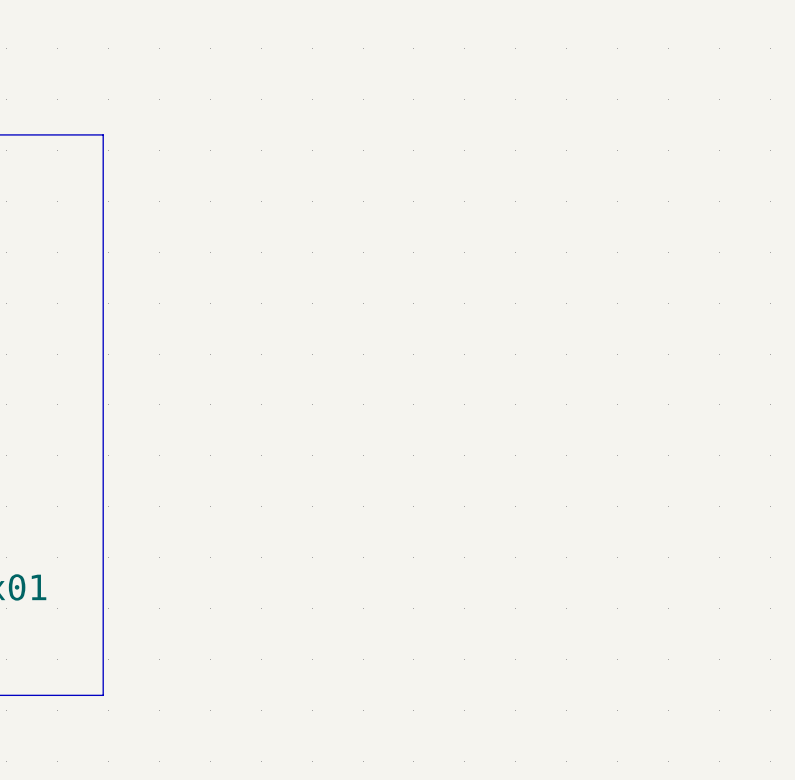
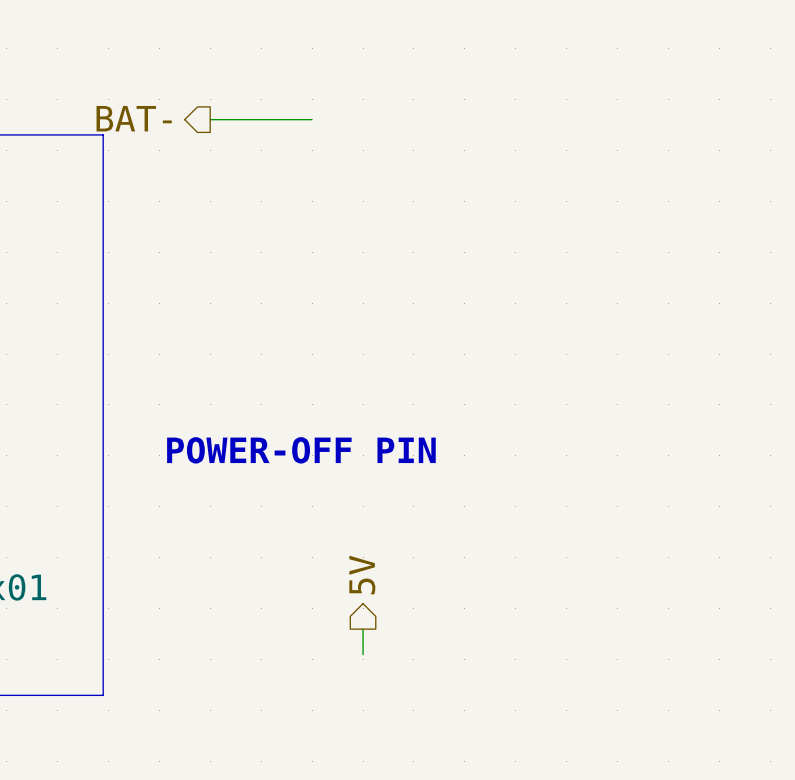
hierarchical label: none -> BAT- (134, 118)
wire: none -> (210, 119) (312, 119)
text: none -> POWER-OFF PIN (301, 450)
hierarchical label: none -> 5V (362, 575)
wire: none -> (363, 629) (363, 654)

